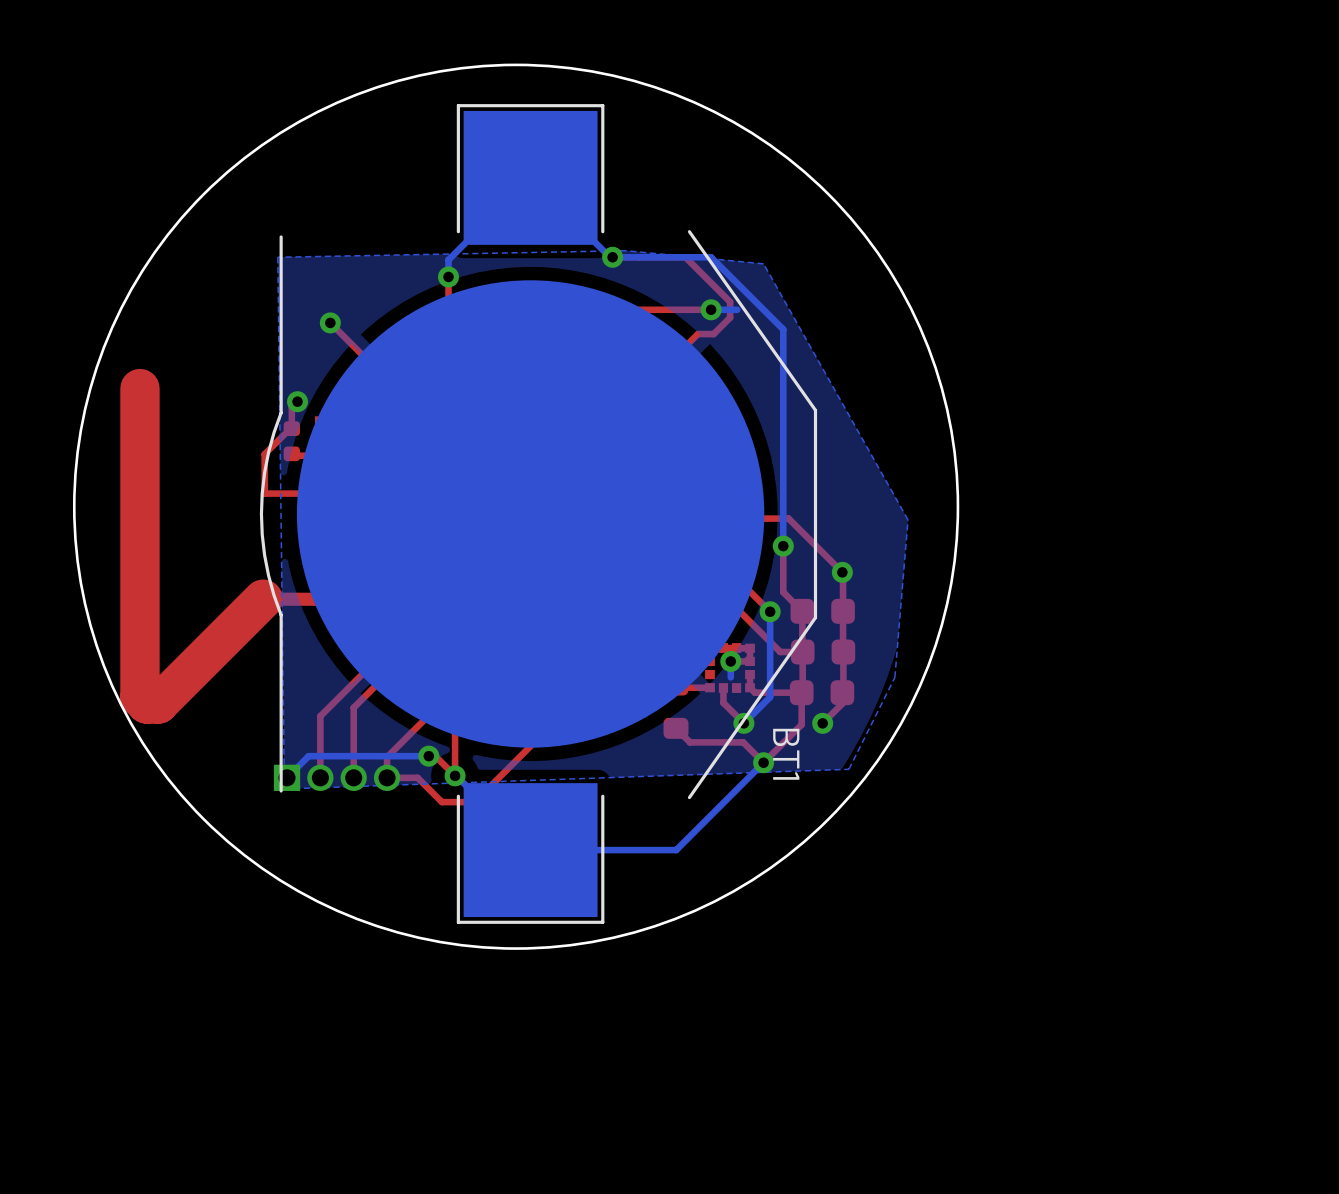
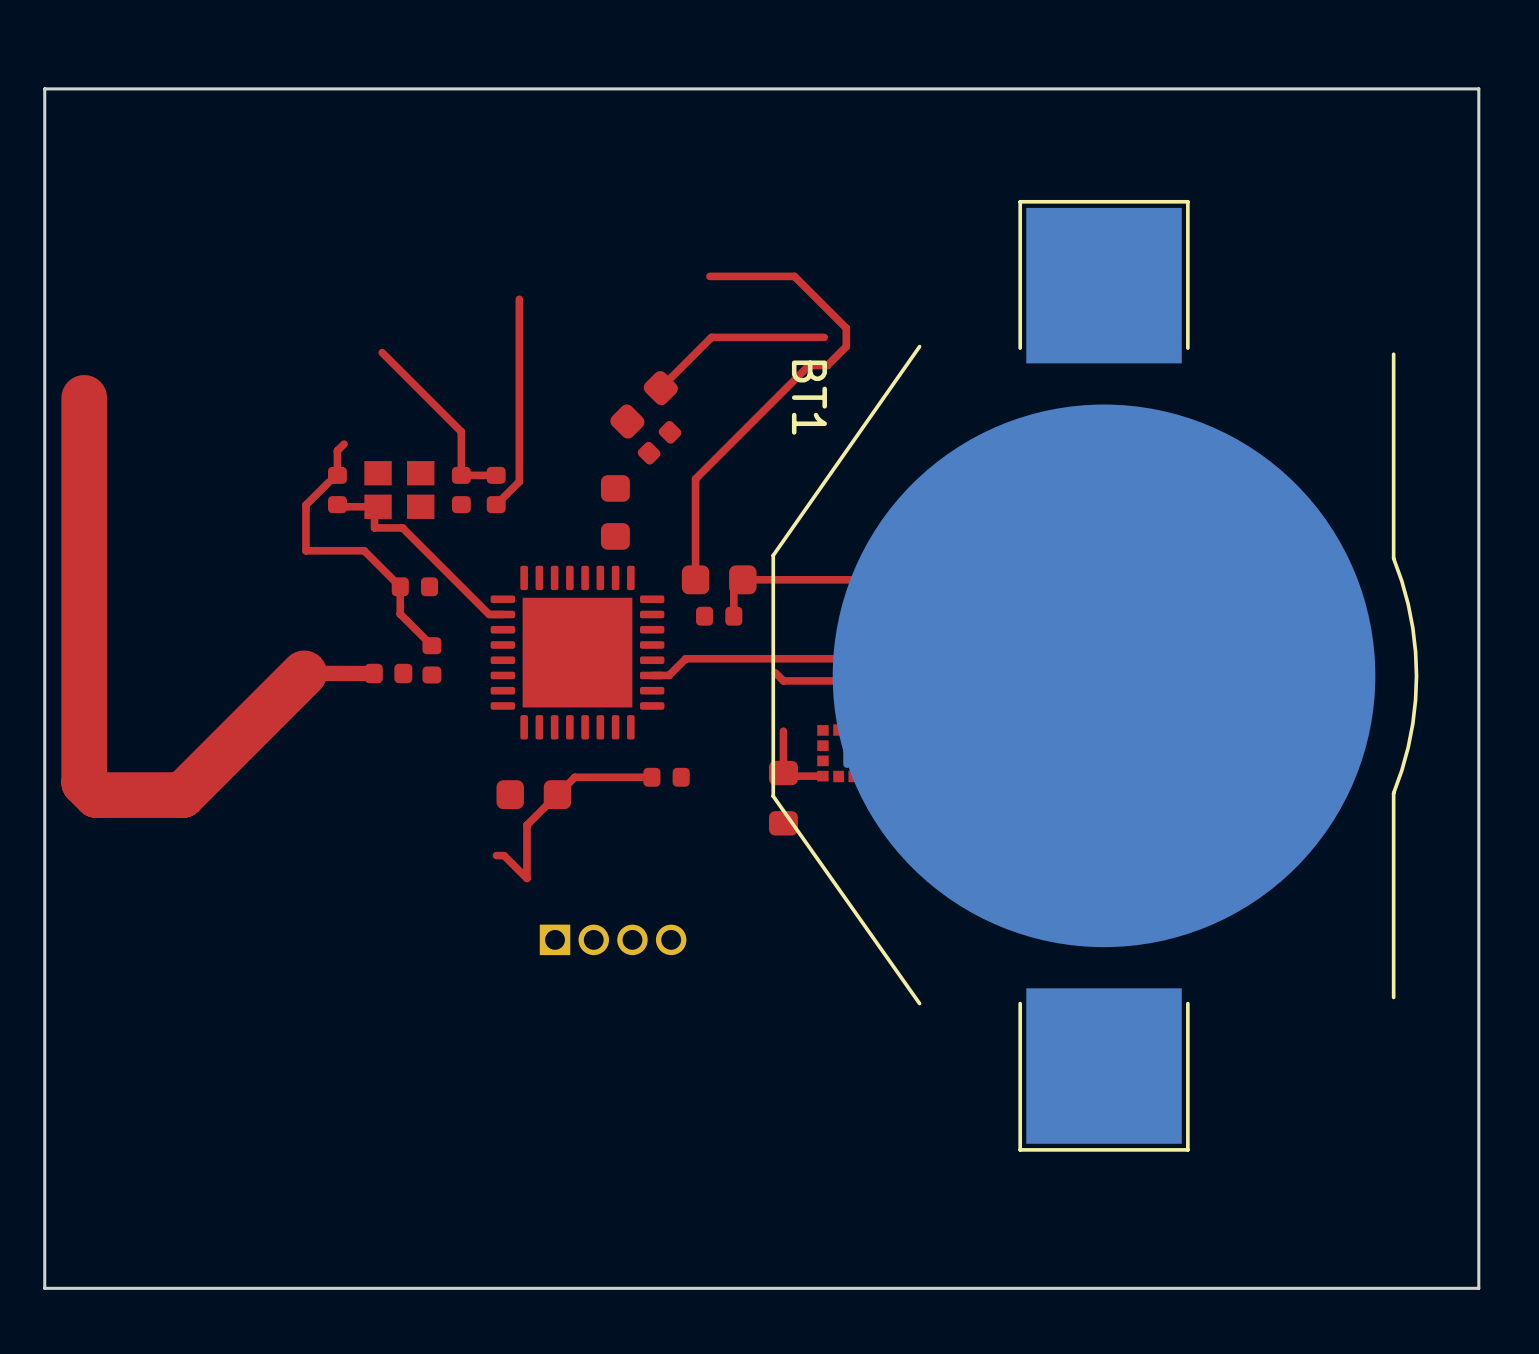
round board edge: [72, 63, 960, 950] -> none
board edge: none -> (1478, 88) (44, 88) (44, 1288) (1478, 1288) (1478, 88)
bottom zone outline: (625, 250) (763, 263) (908, 519) (894, 677) (848, 769) (284, 788) (277, 257) (625, 250) -> none
via: (612, 257) -> none
bottom track: (448, 276) (448, 259) (530, 177) (609, 257) (711, 257) (783, 329) (783, 546) -> none
via: (448, 276) -> none
via: (711, 309) -> none
bottom track: (737, 309) (711, 309) -> none
via: (330, 322) -> none
top track: (139, 388) (139, 697) (146, 704) -> (84, 397) (84, 782) (96, 795) (169, 795)
via: (297, 401) -> none
BT1 rotation: 0° (538, 513) -> 180° (1094, 675)
top track: (783, 546) (783, 592) (802, 611) (802, 651) -> none
via: (783, 546) -> none
via: (842, 572) -> none
bottom track: (770, 611) (770, 697) (743, 723) -> none
via: (770, 611) -> none
top track: (434, 614) (422, 614) (320, 716) (320, 777) -> none
top track: (434, 627) (353, 707) (353, 777) -> none
part: (823, 652) -> none
via: (730, 661) -> none
top track: (750, 674) (750, 687) (755, 692) (801, 692) (801, 724) (763, 762) (743, 742) (690, 742) (675, 728) -> none
top track: (587, 688) (474, 802) (441, 802) (417, 777) (387, 777) (387, 757) (440, 703) -> none
top track: (723, 688) (723, 702) (743, 723) -> none
part: (822, 692) -> none
via: (743, 723) -> none
via: (822, 723) -> none
bottom track: (428, 756) (308, 756) (287, 777) -> none
via: (428, 756) -> none
bottom track: (763, 762) (676, 850) (530, 850) (455, 775) -> none
via: (763, 762) -> none
via: (455, 775) -> none
part position: (337, 777) -> (613, 939)

